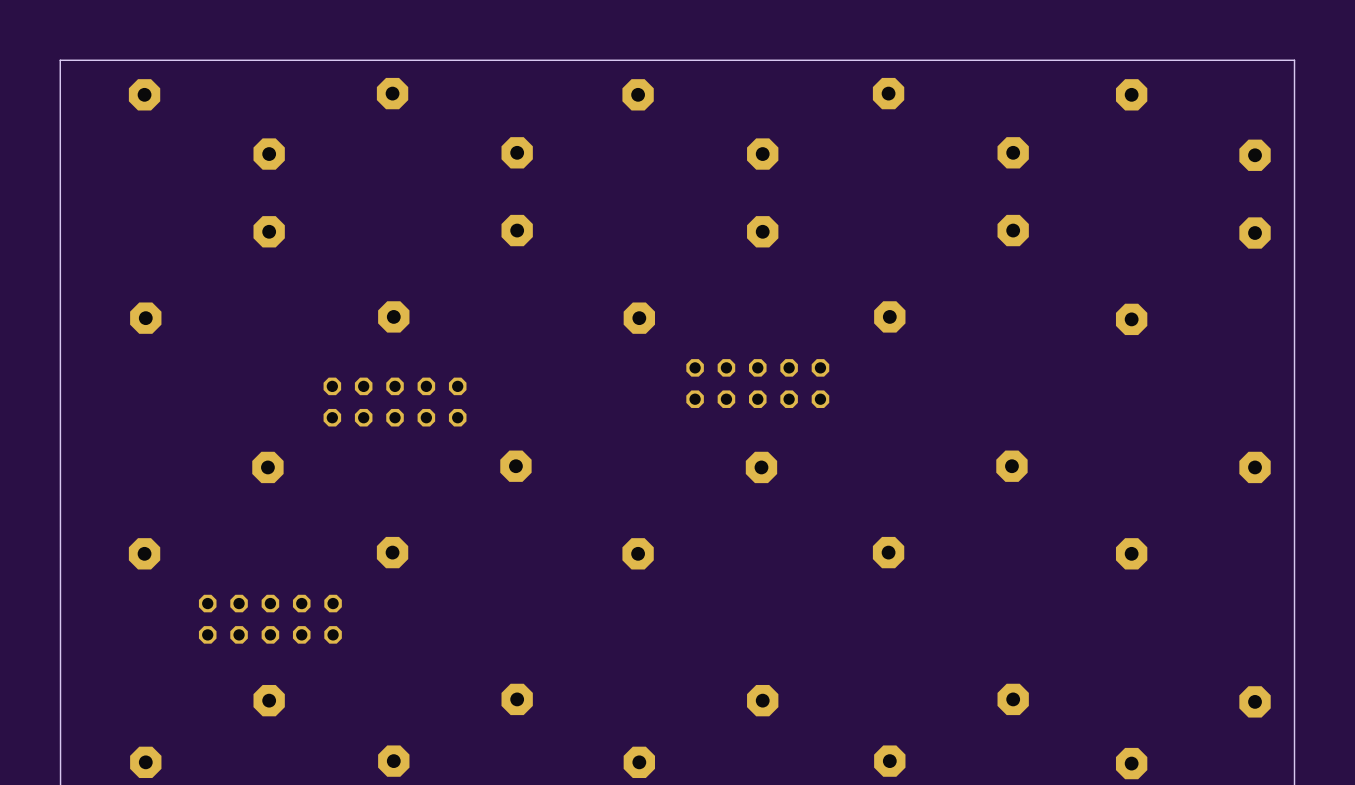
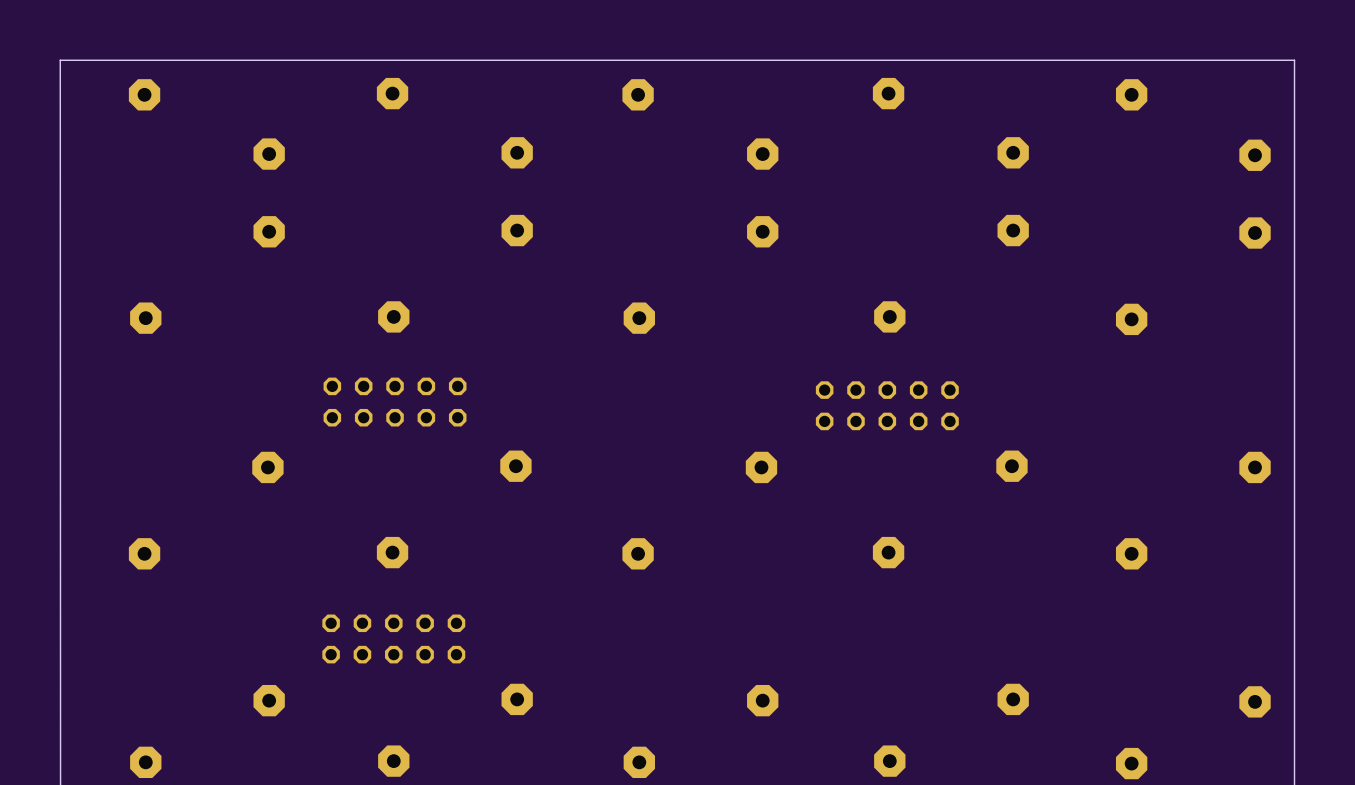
part position: (757, 383) -> (887, 405)
part position: (270, 619) -> (393, 638)

